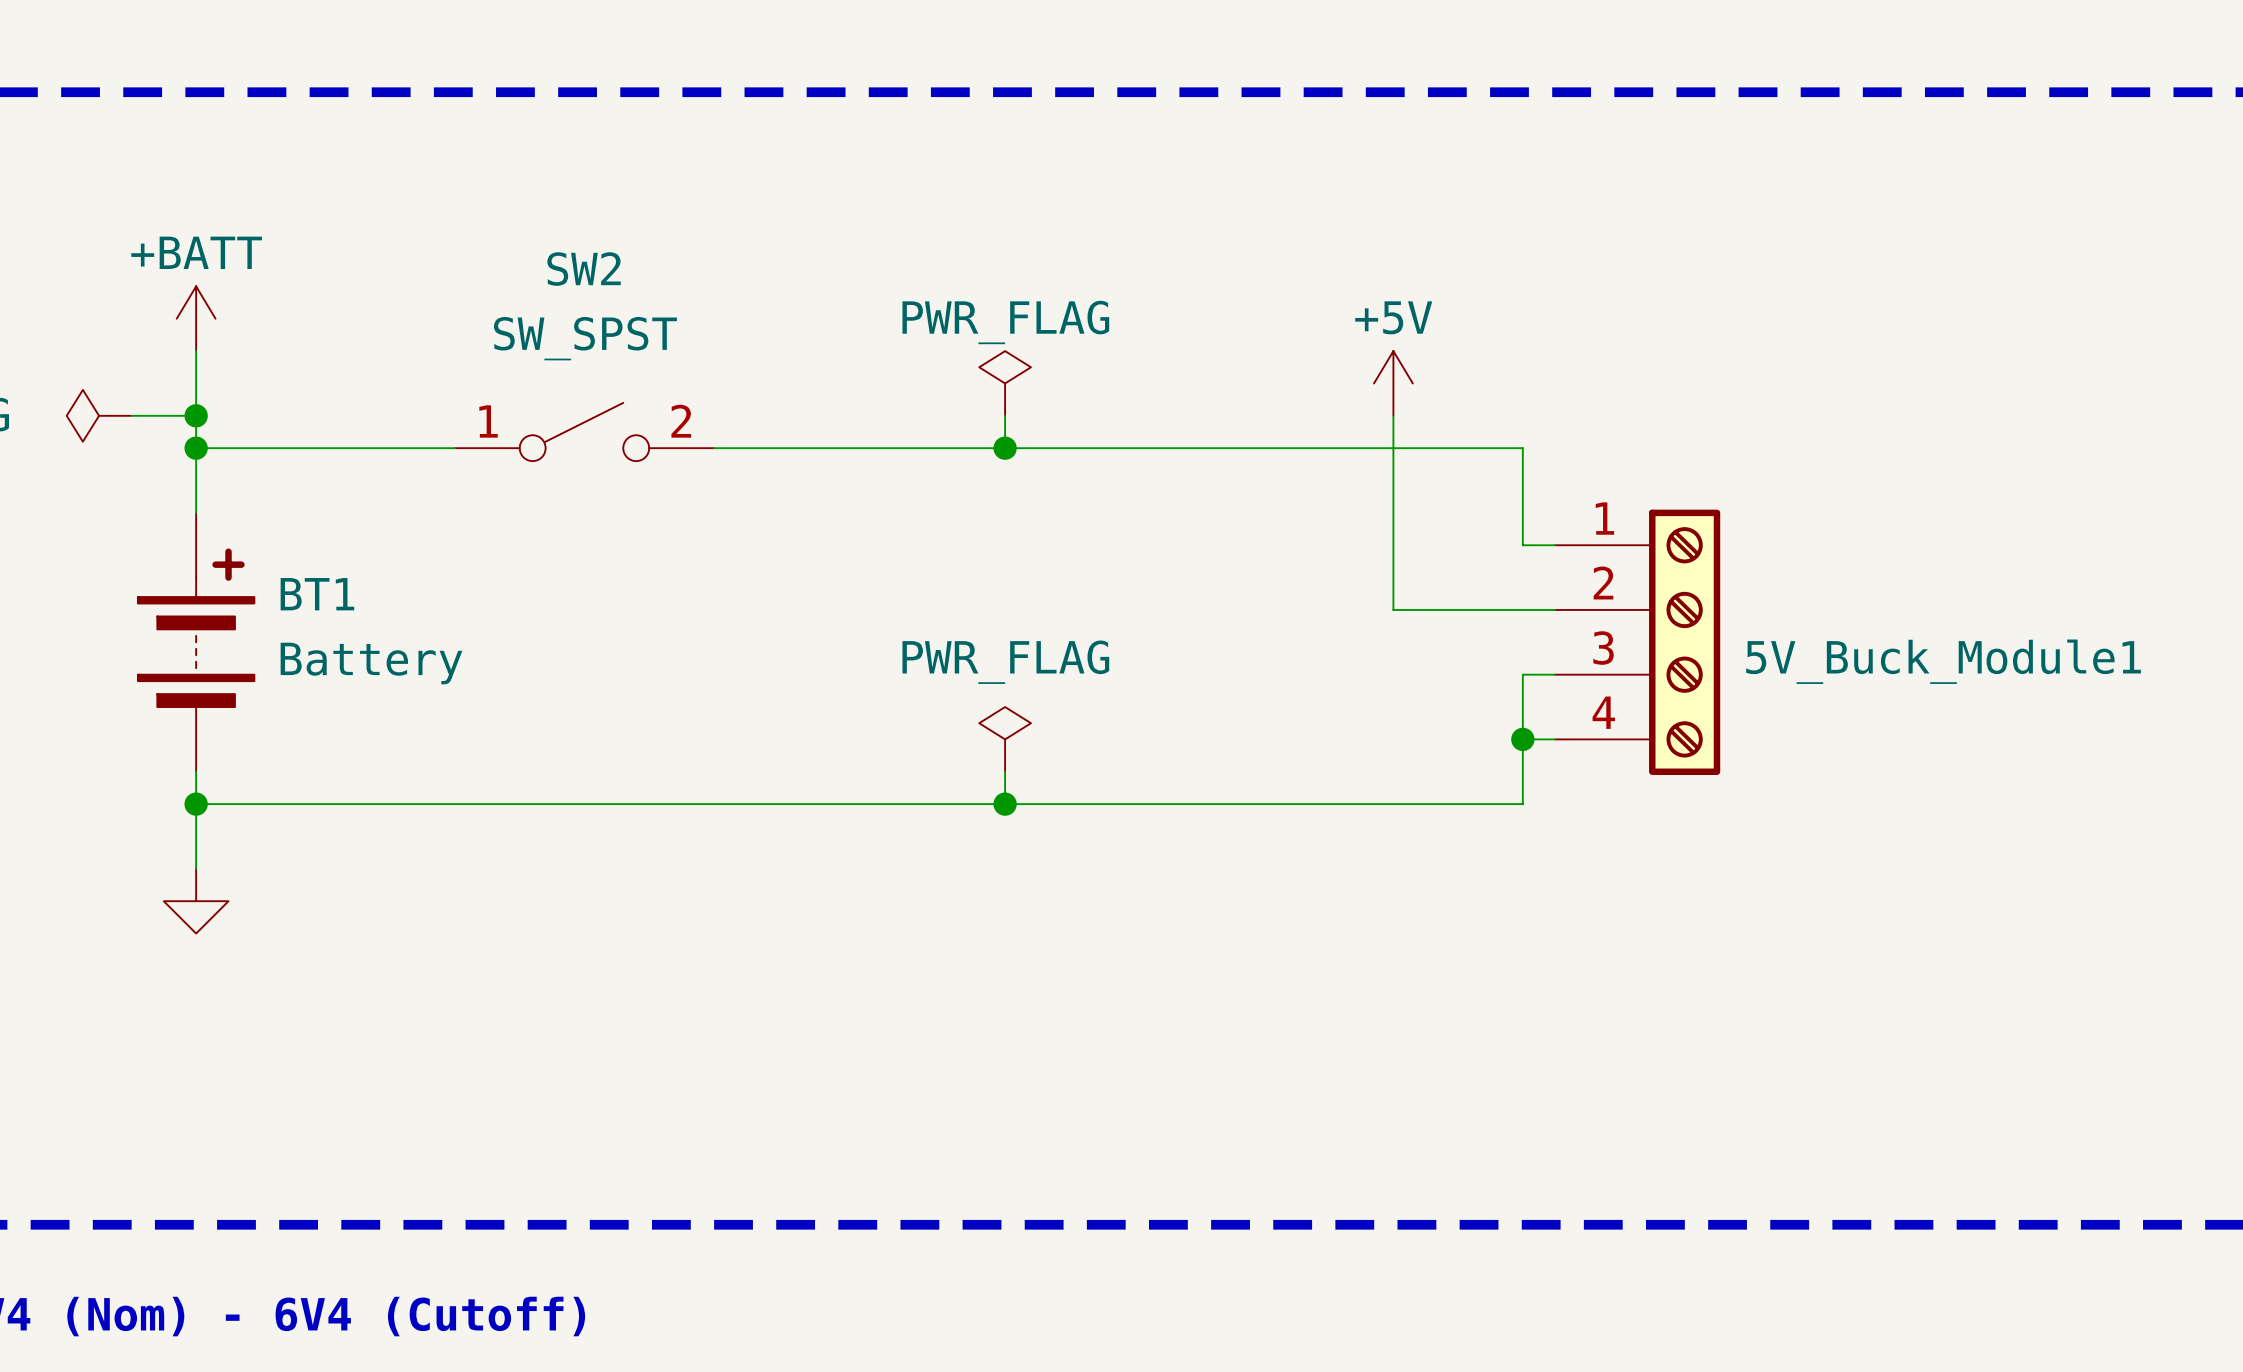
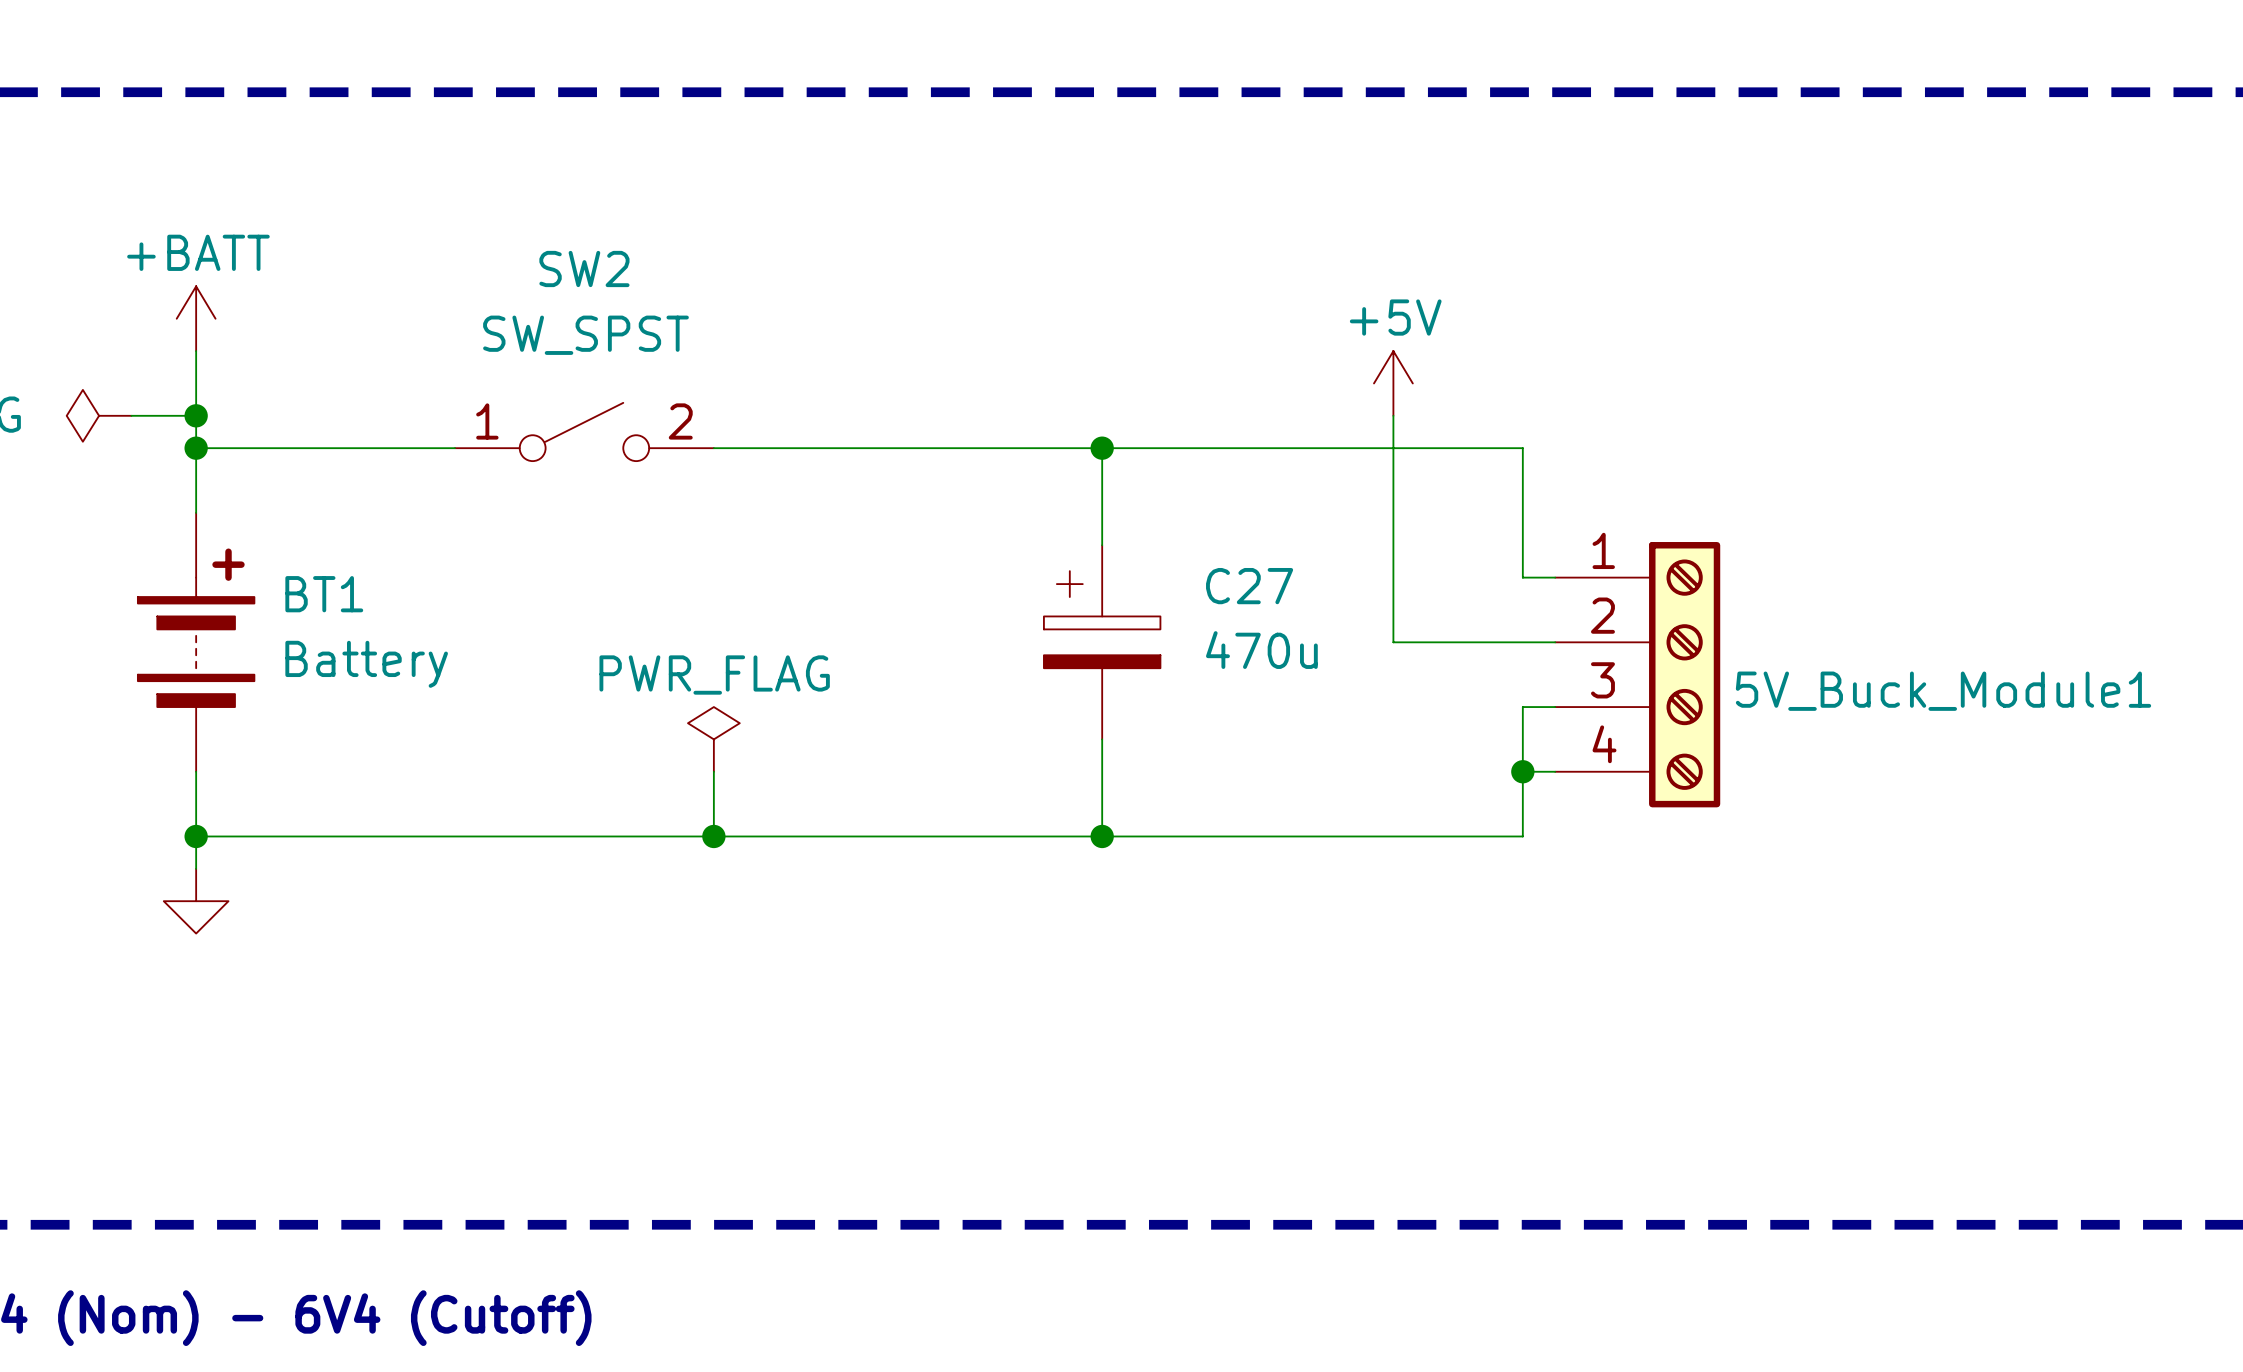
power symbol: PWR_FLAG (1005, 383) -> none
wire: (1005, 415) (1005, 448) -> none
junction position: (1005, 448) -> (1102, 448)
wire: none -> (1102, 448) (1102, 545)
wire: (1522, 545) (1555, 545) -> (1522, 545) (1522, 577) (1555, 577)
wire: (1393, 609) (1555, 609) -> (1393, 609) (1393, 642) (1555, 642)
C27: none -> 470u (1102, 642)
5V_Buck_Module1 position: (1637, 642) -> (1637, 674)
wire: (1555, 674) (1522, 674) (1522, 707) -> (1555, 707) (1522, 707)
power symbol: none -> PWR_FLAG (713, 739)
power symbol: PWR_FLAG (1005, 739) -> none
wire: none -> (1102, 739) (1102, 836)
wire: (1522, 739) (1555, 739) -> (1522, 771) (1555, 771)
junction position: (1522, 739) -> (1522, 771)
wire: none -> (713, 771) (713, 836)
wire: (1005, 771) (1005, 804) -> none
wire: (196, 804) (1522, 804) -> (196, 836) (1522, 836) (1522, 804)
junction position: (196, 804) -> (196, 836)
junction position: (1005, 804) -> (1102, 836)
junction: none -> (713, 836)

